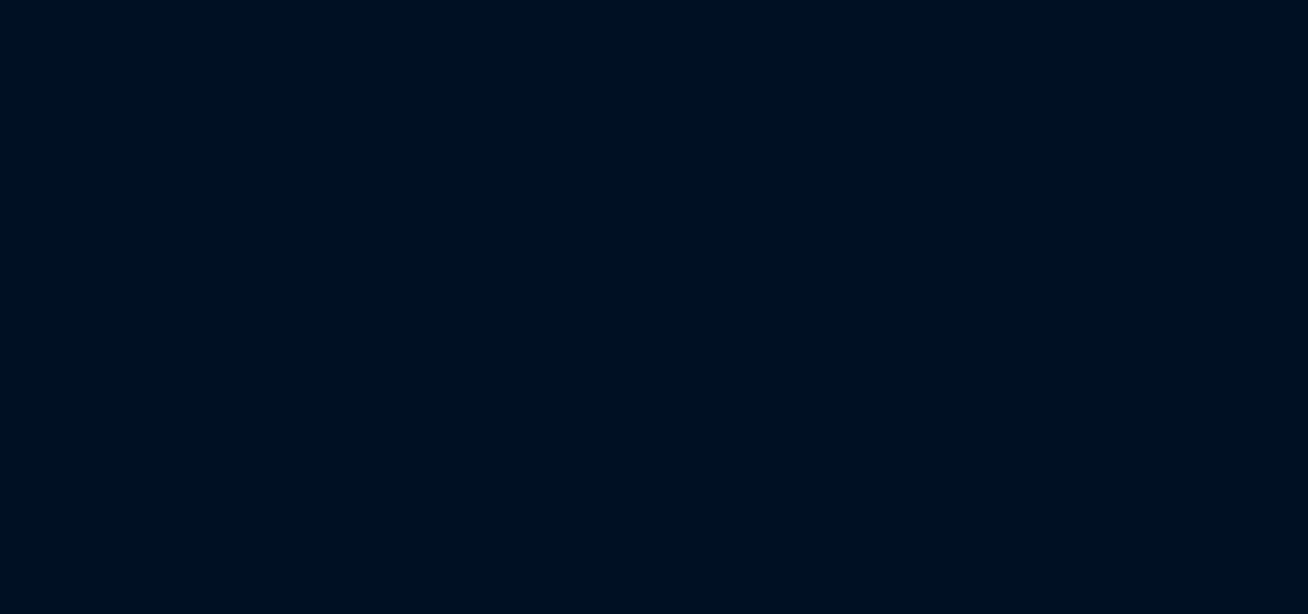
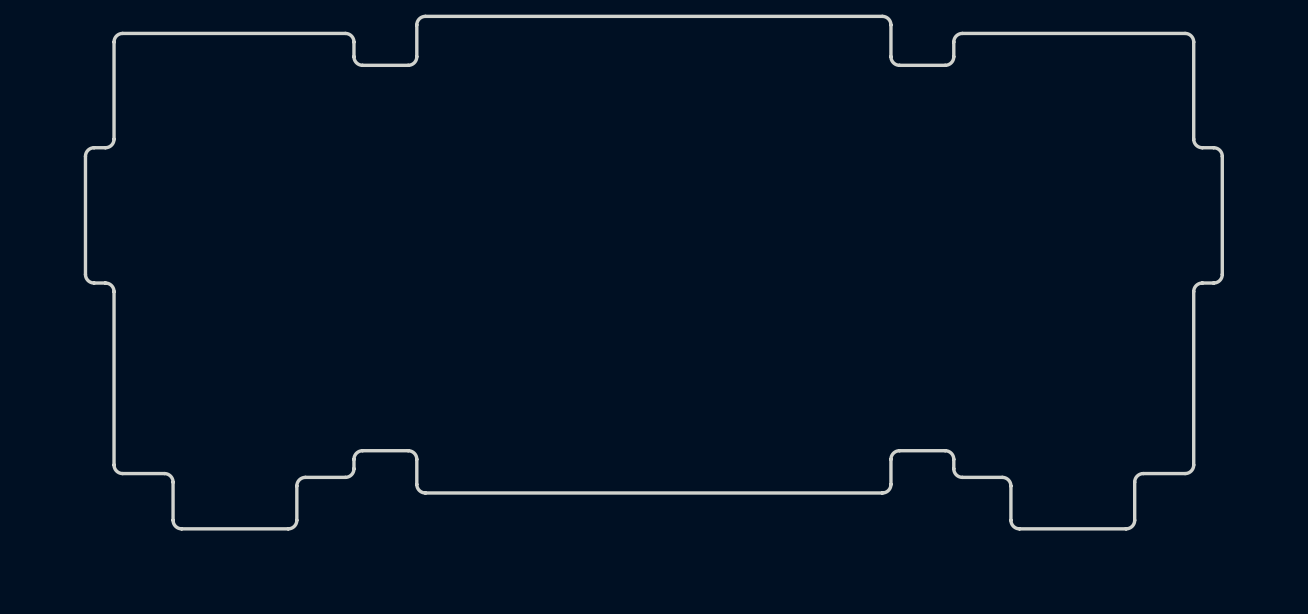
drawing: none -> [83, 14, 1224, 531]

